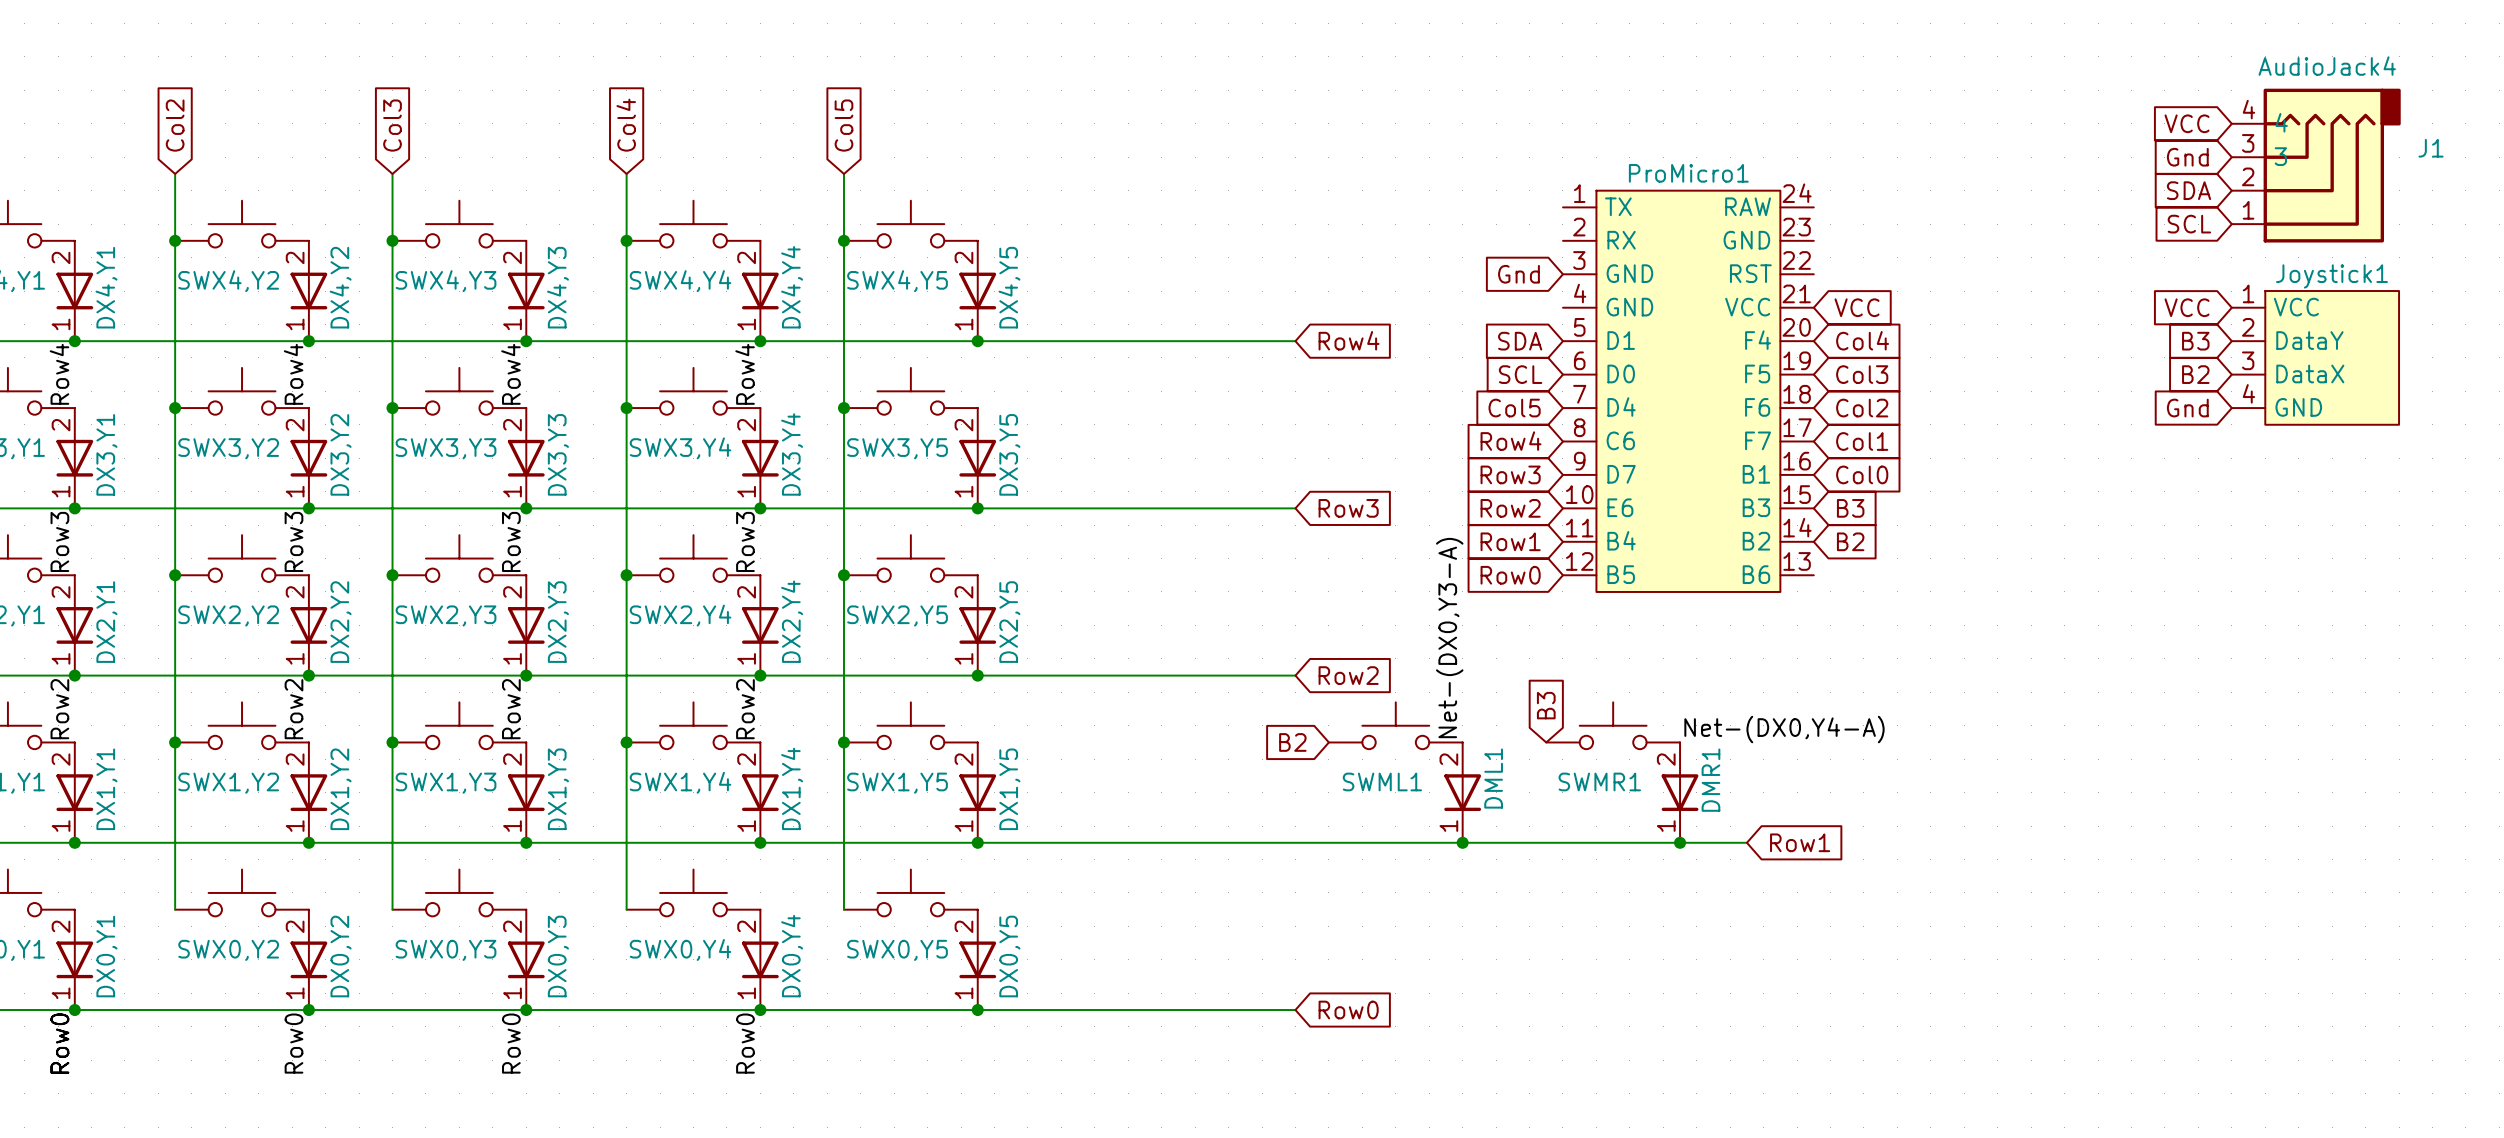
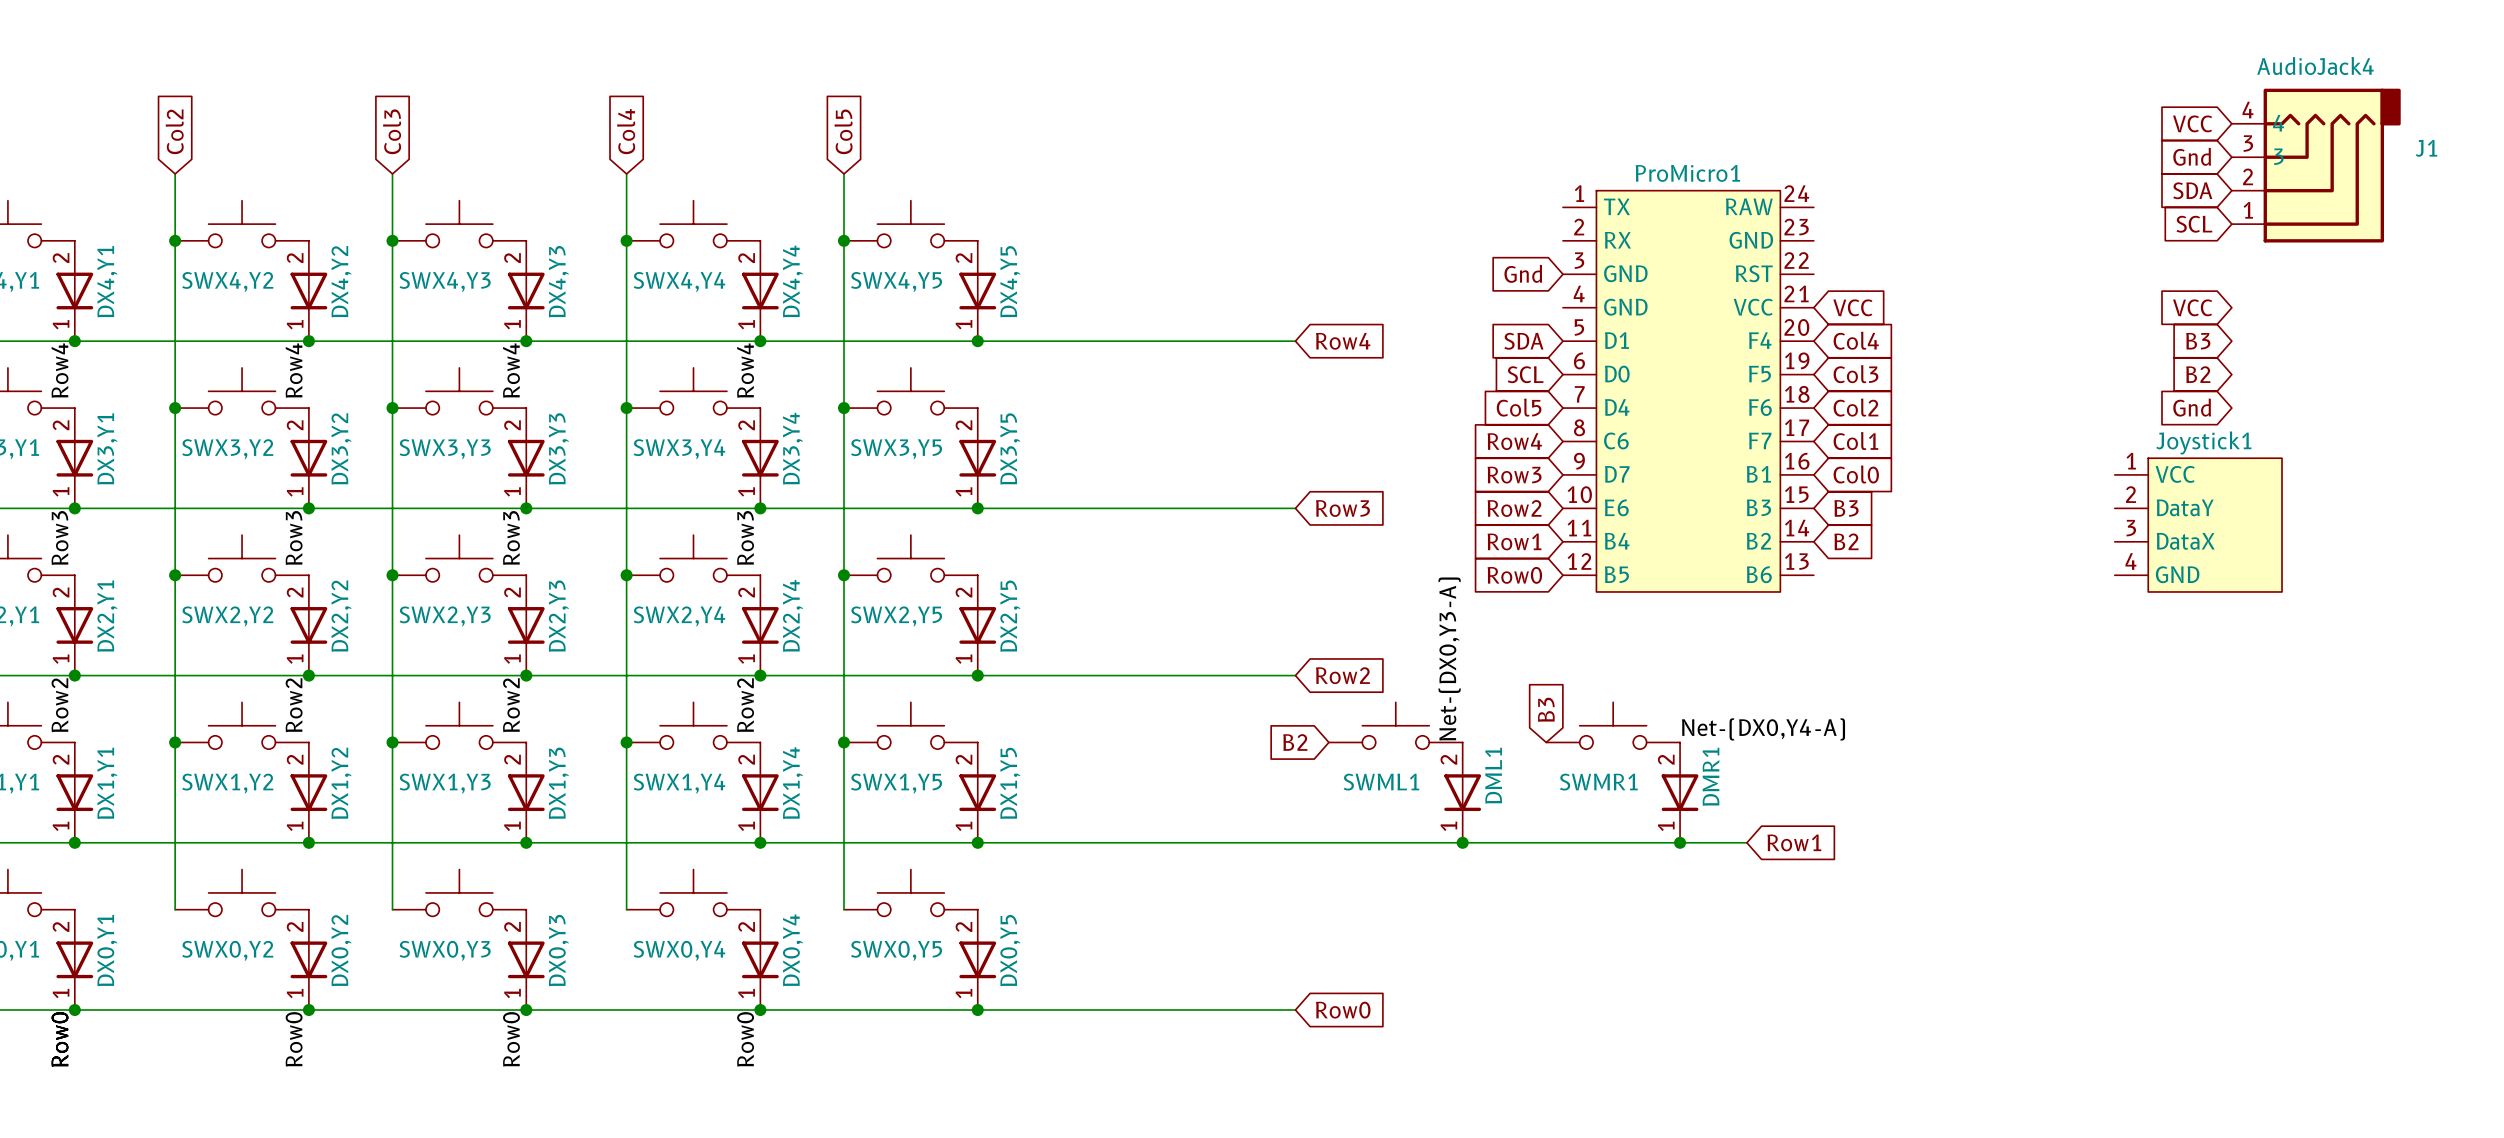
Joystick1 position: (2315, 357) -> (2198, 525)

